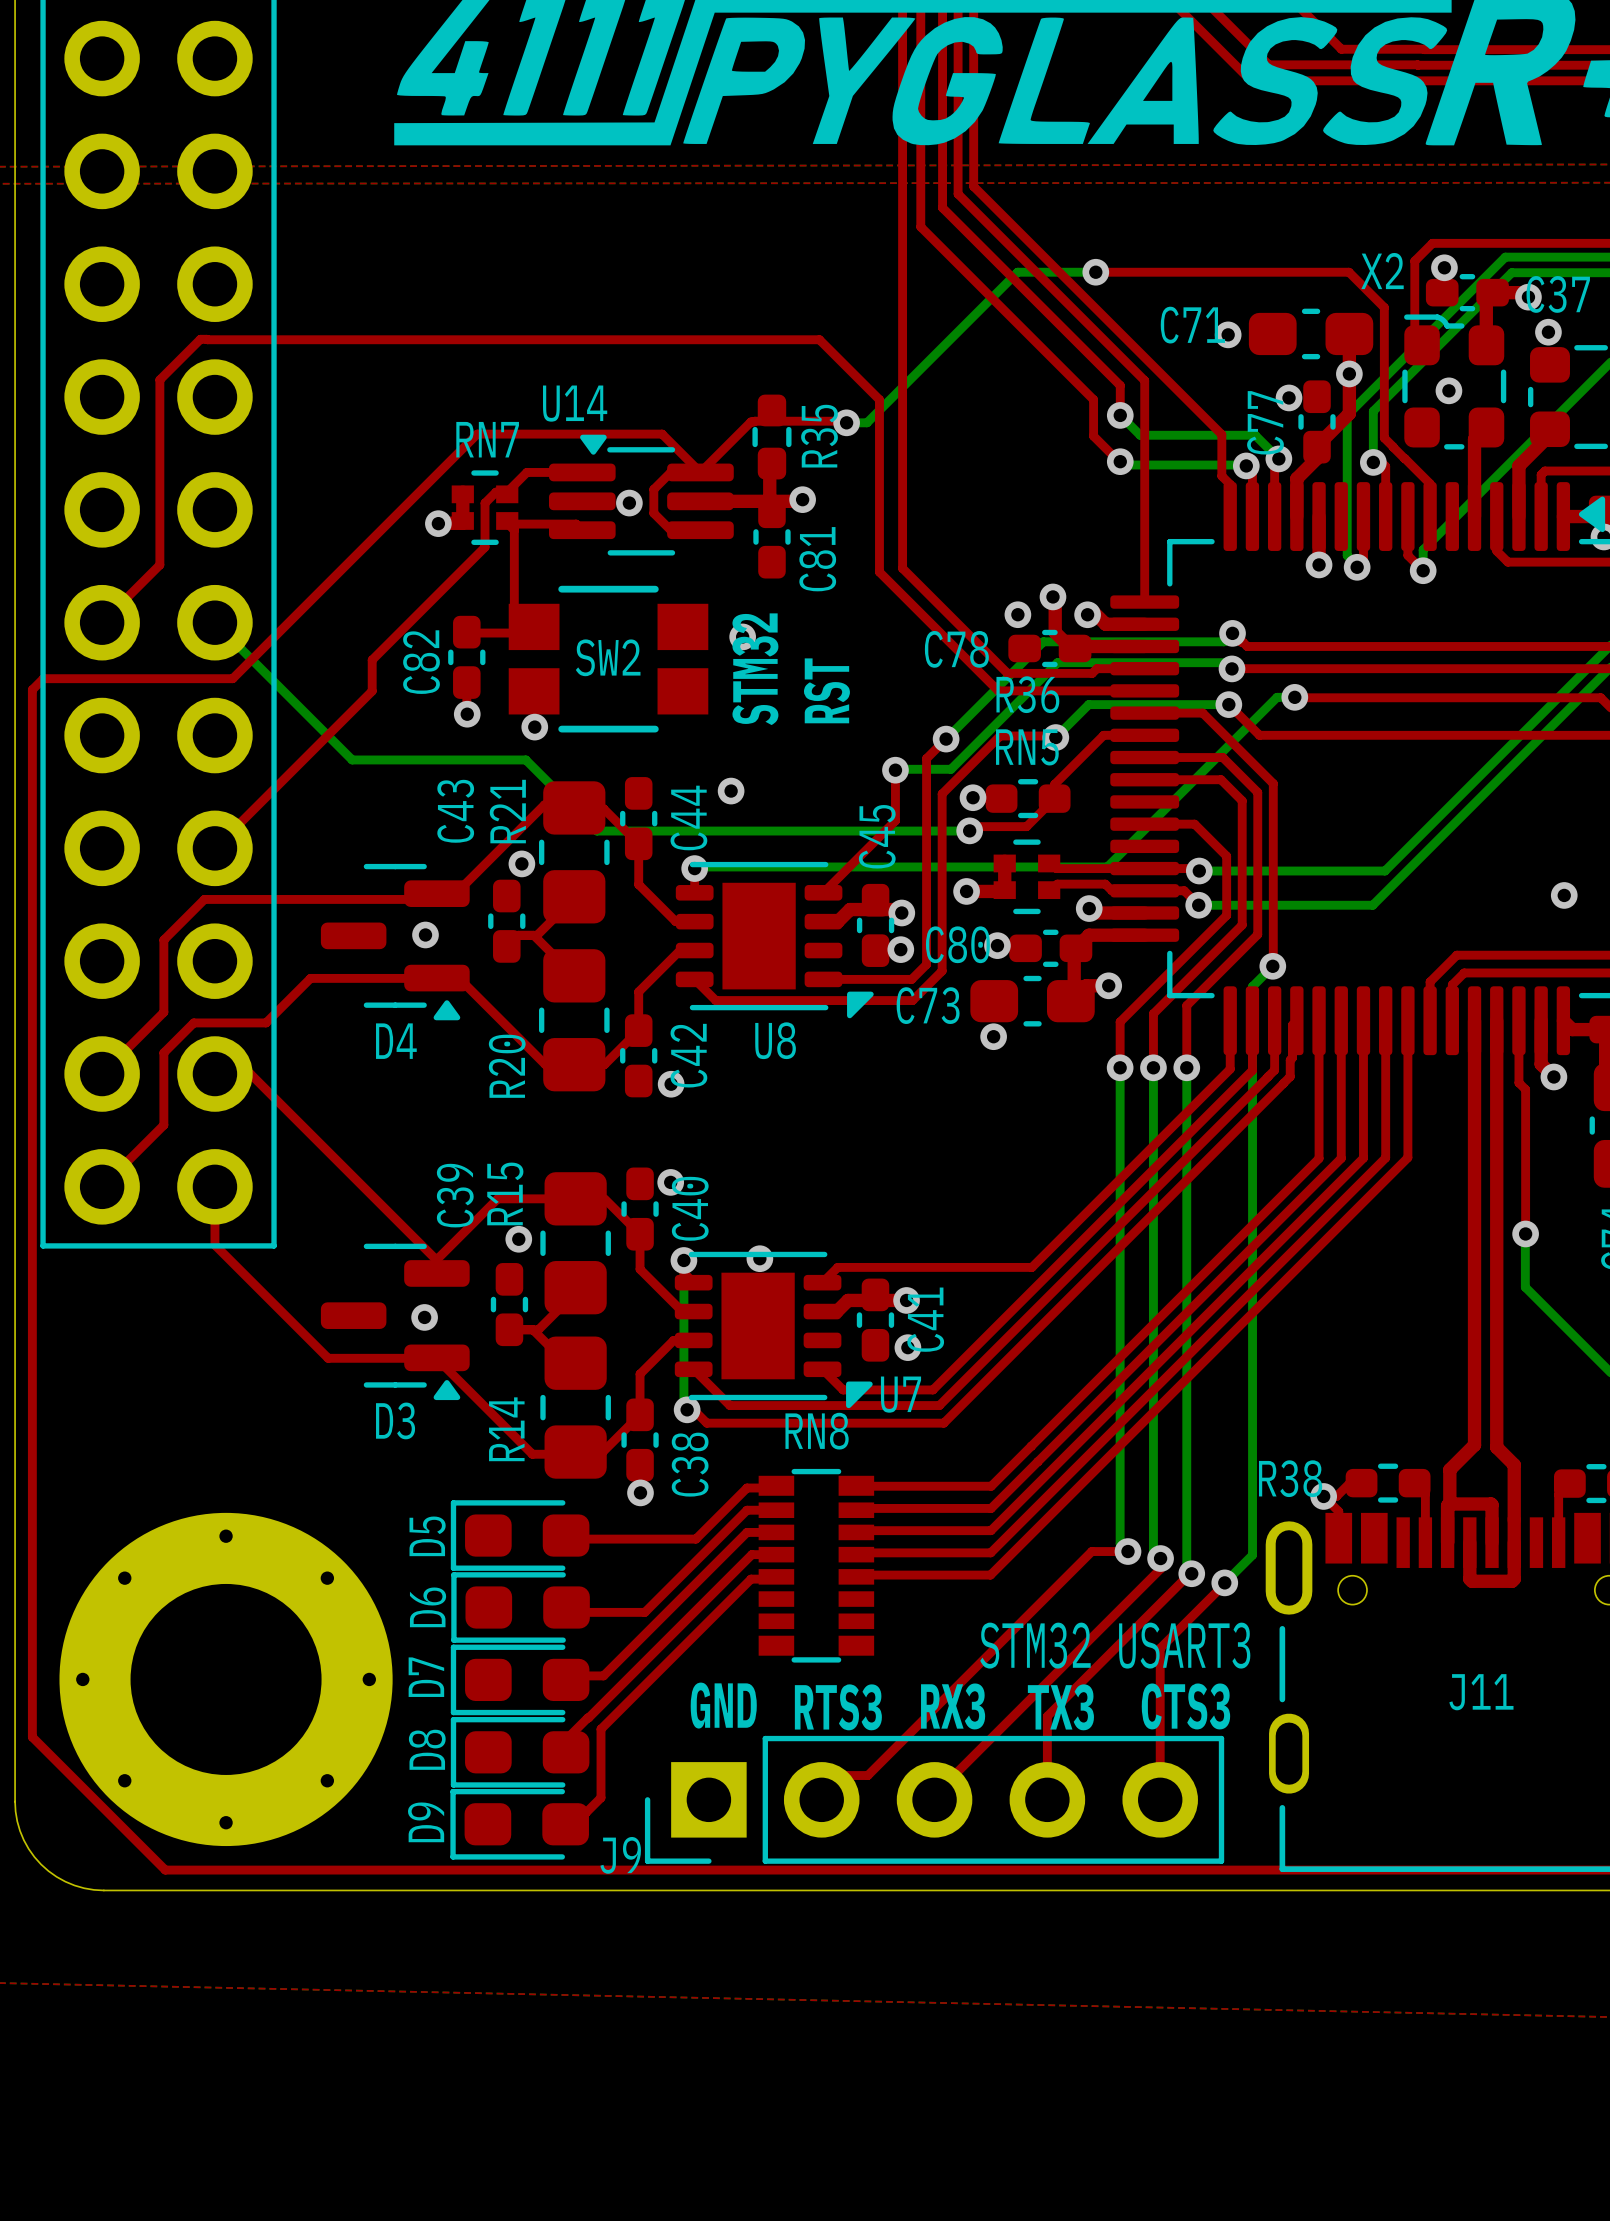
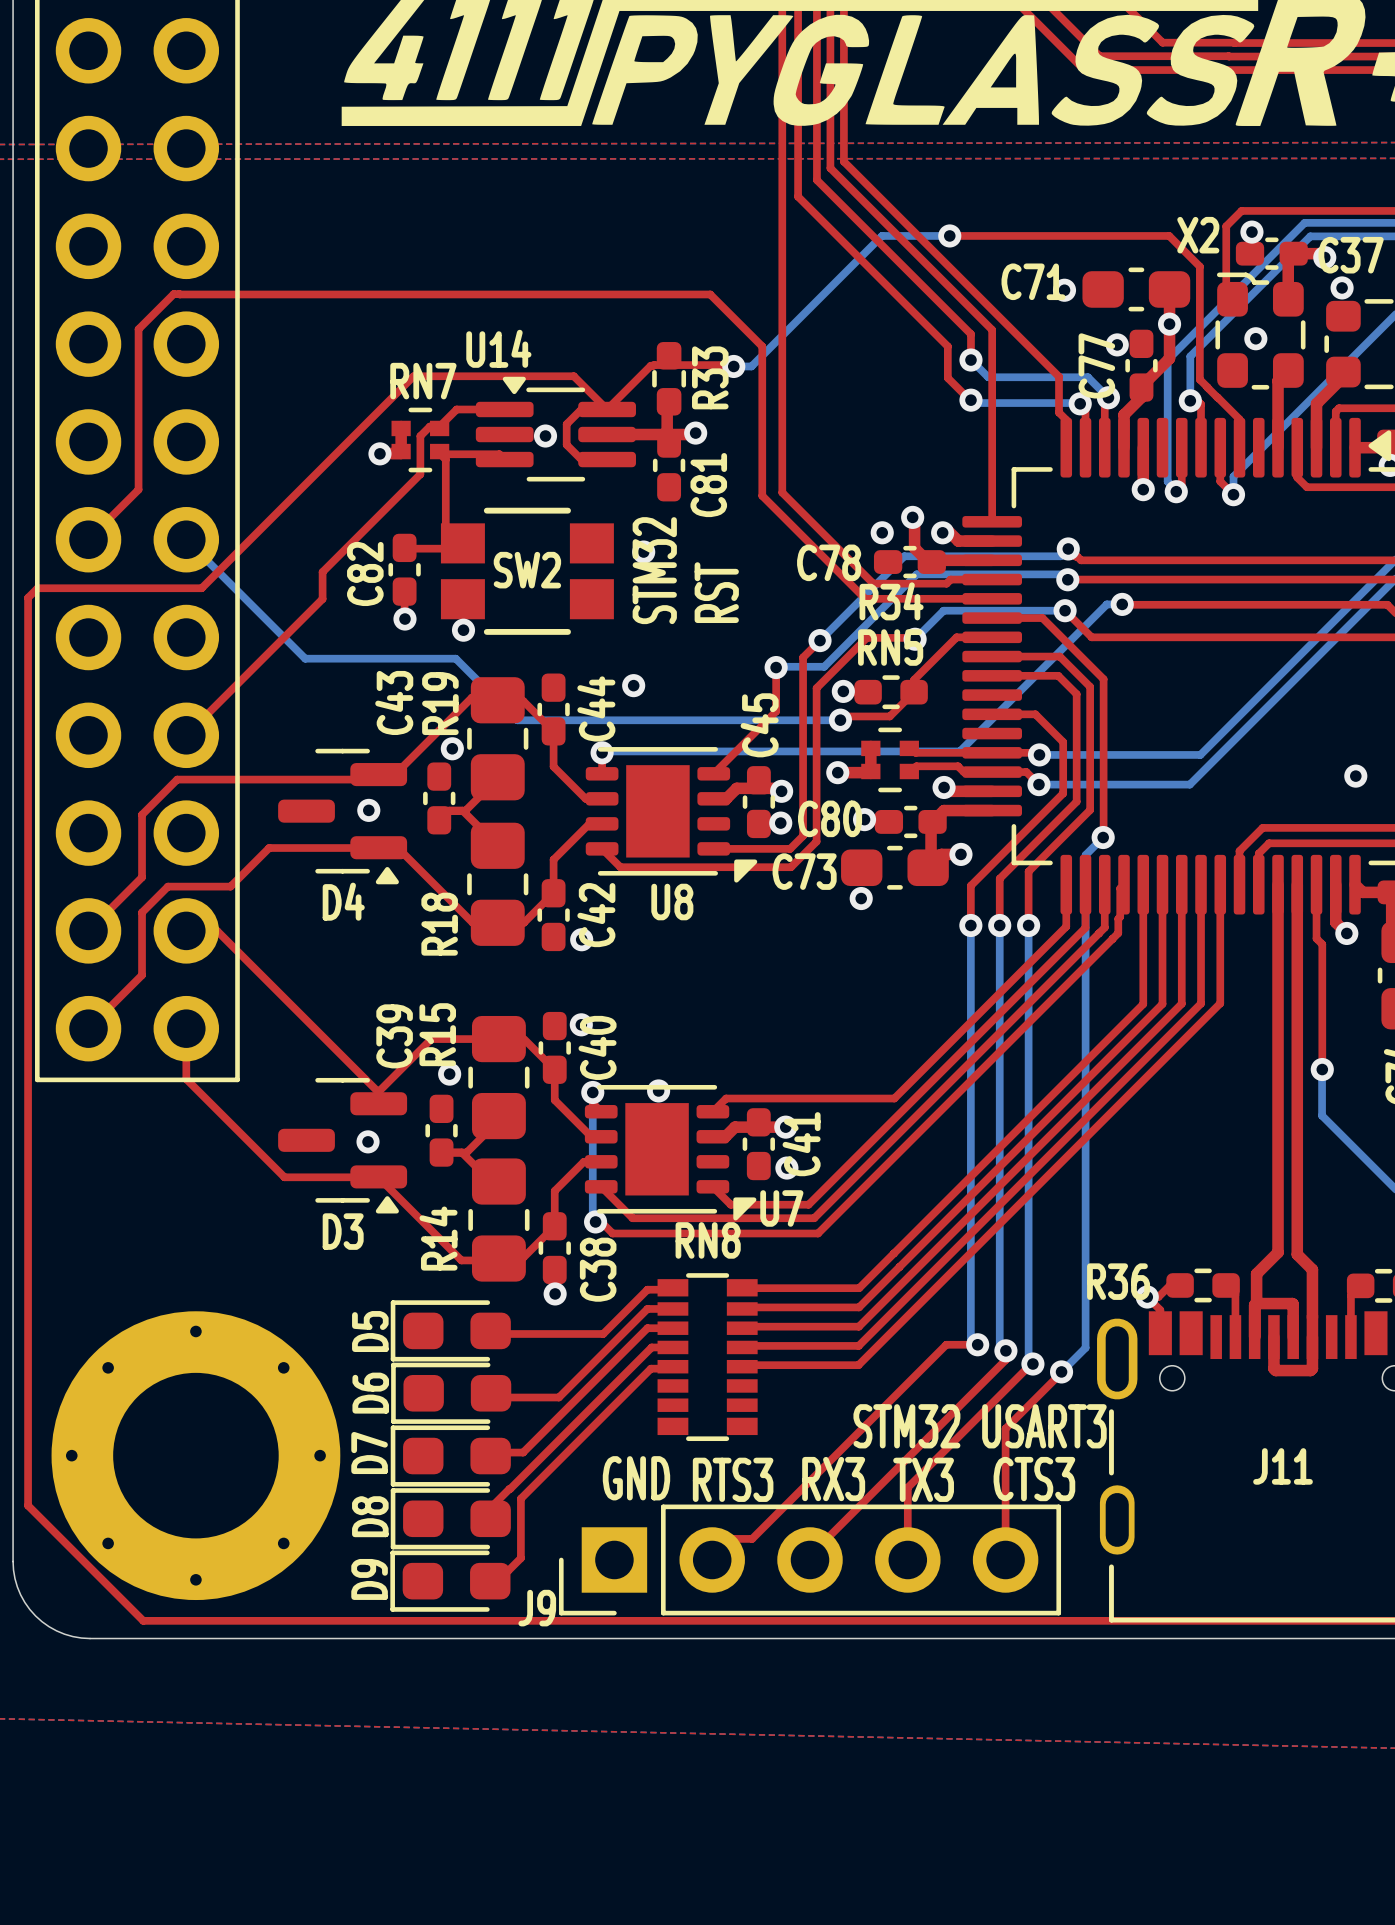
R35 name: R35 (819, 436) -> R33 (710, 377)
R36 name: R36 (1027, 694) -> R34 (891, 601)
R21 name: R21 (507, 811) -> R19 (440, 703)
R20 name: R20 (507, 1066) -> R18 (439, 924)
R38 name: R38 (1290, 1478) -> R36 (1118, 1281)

